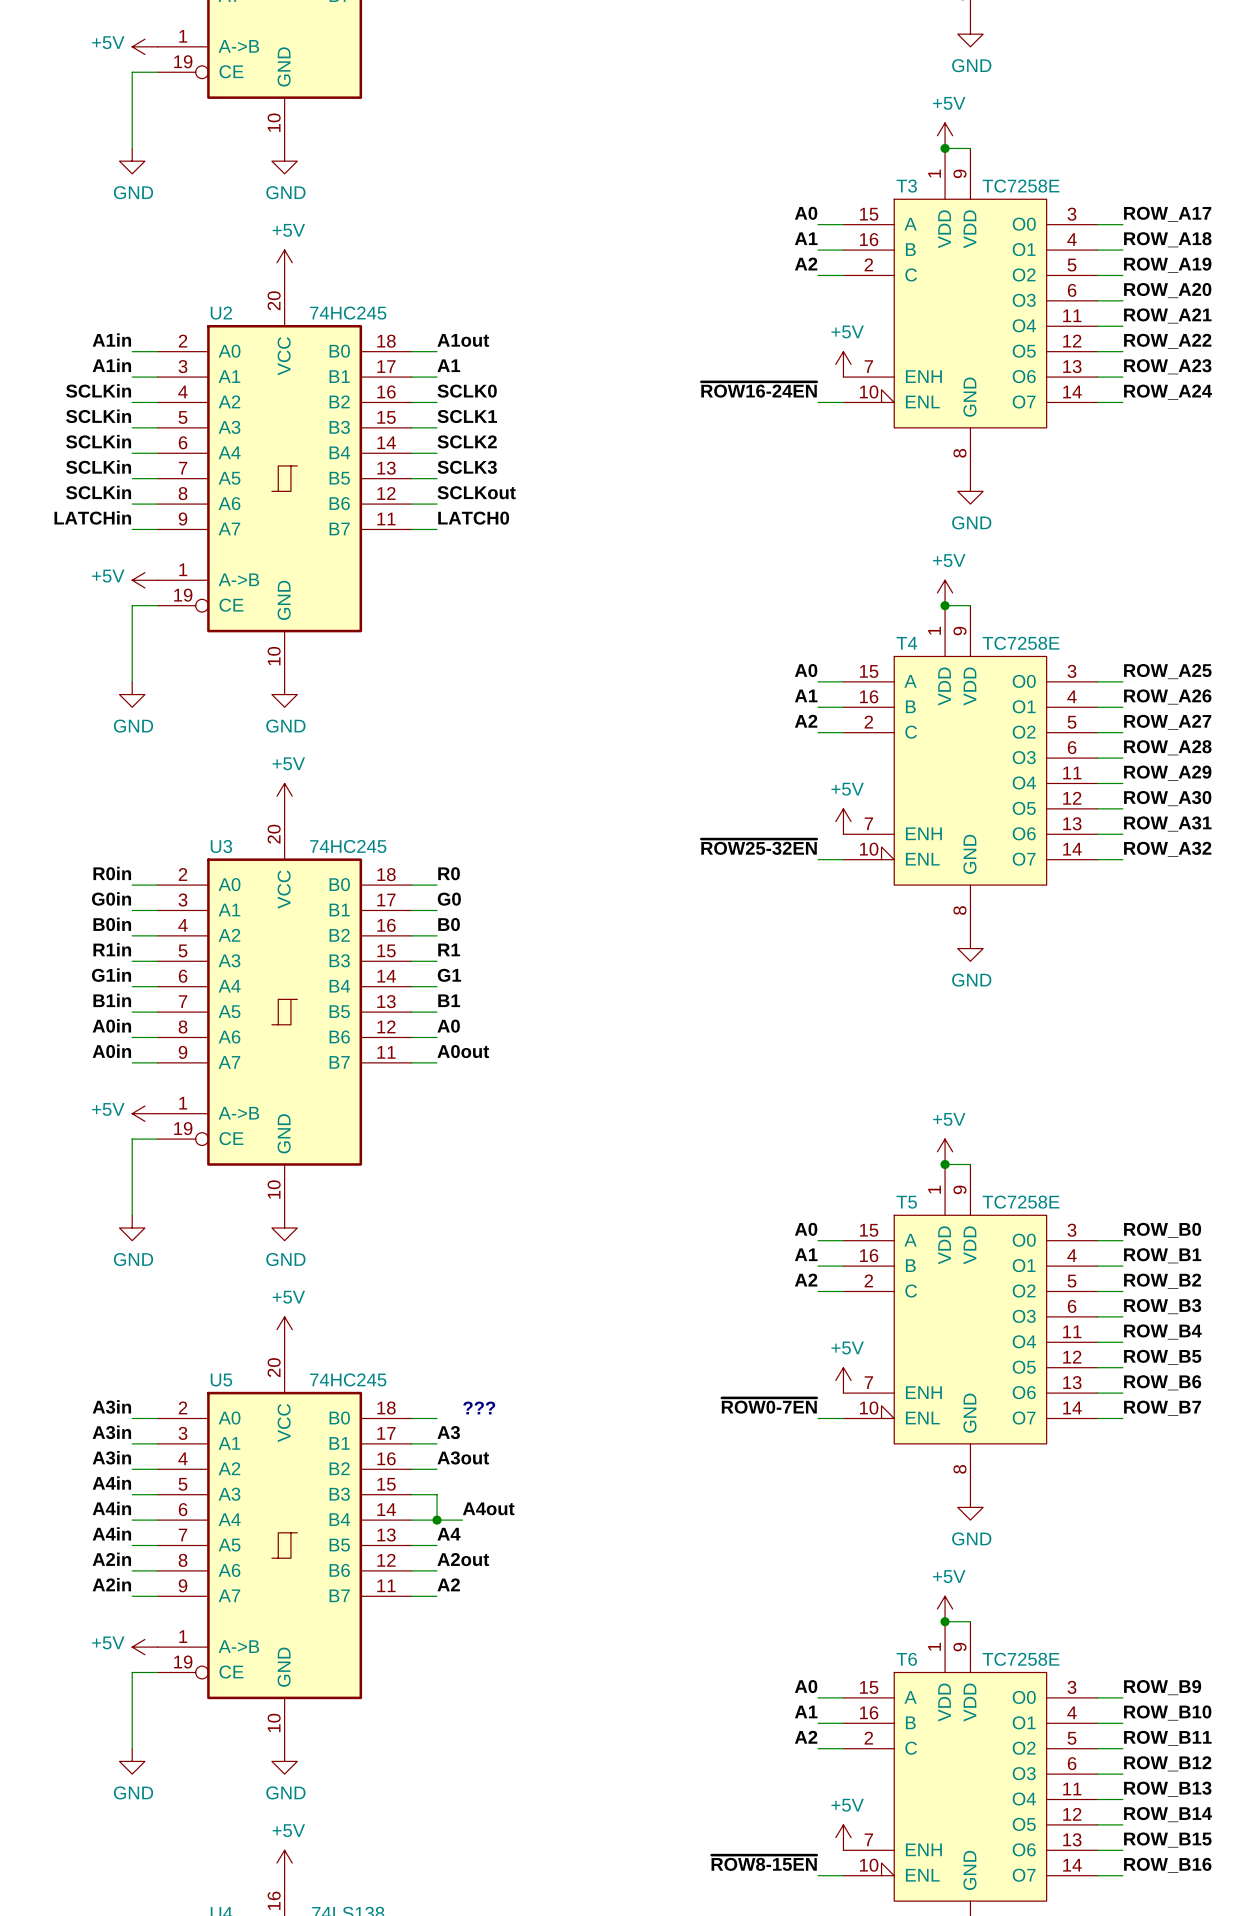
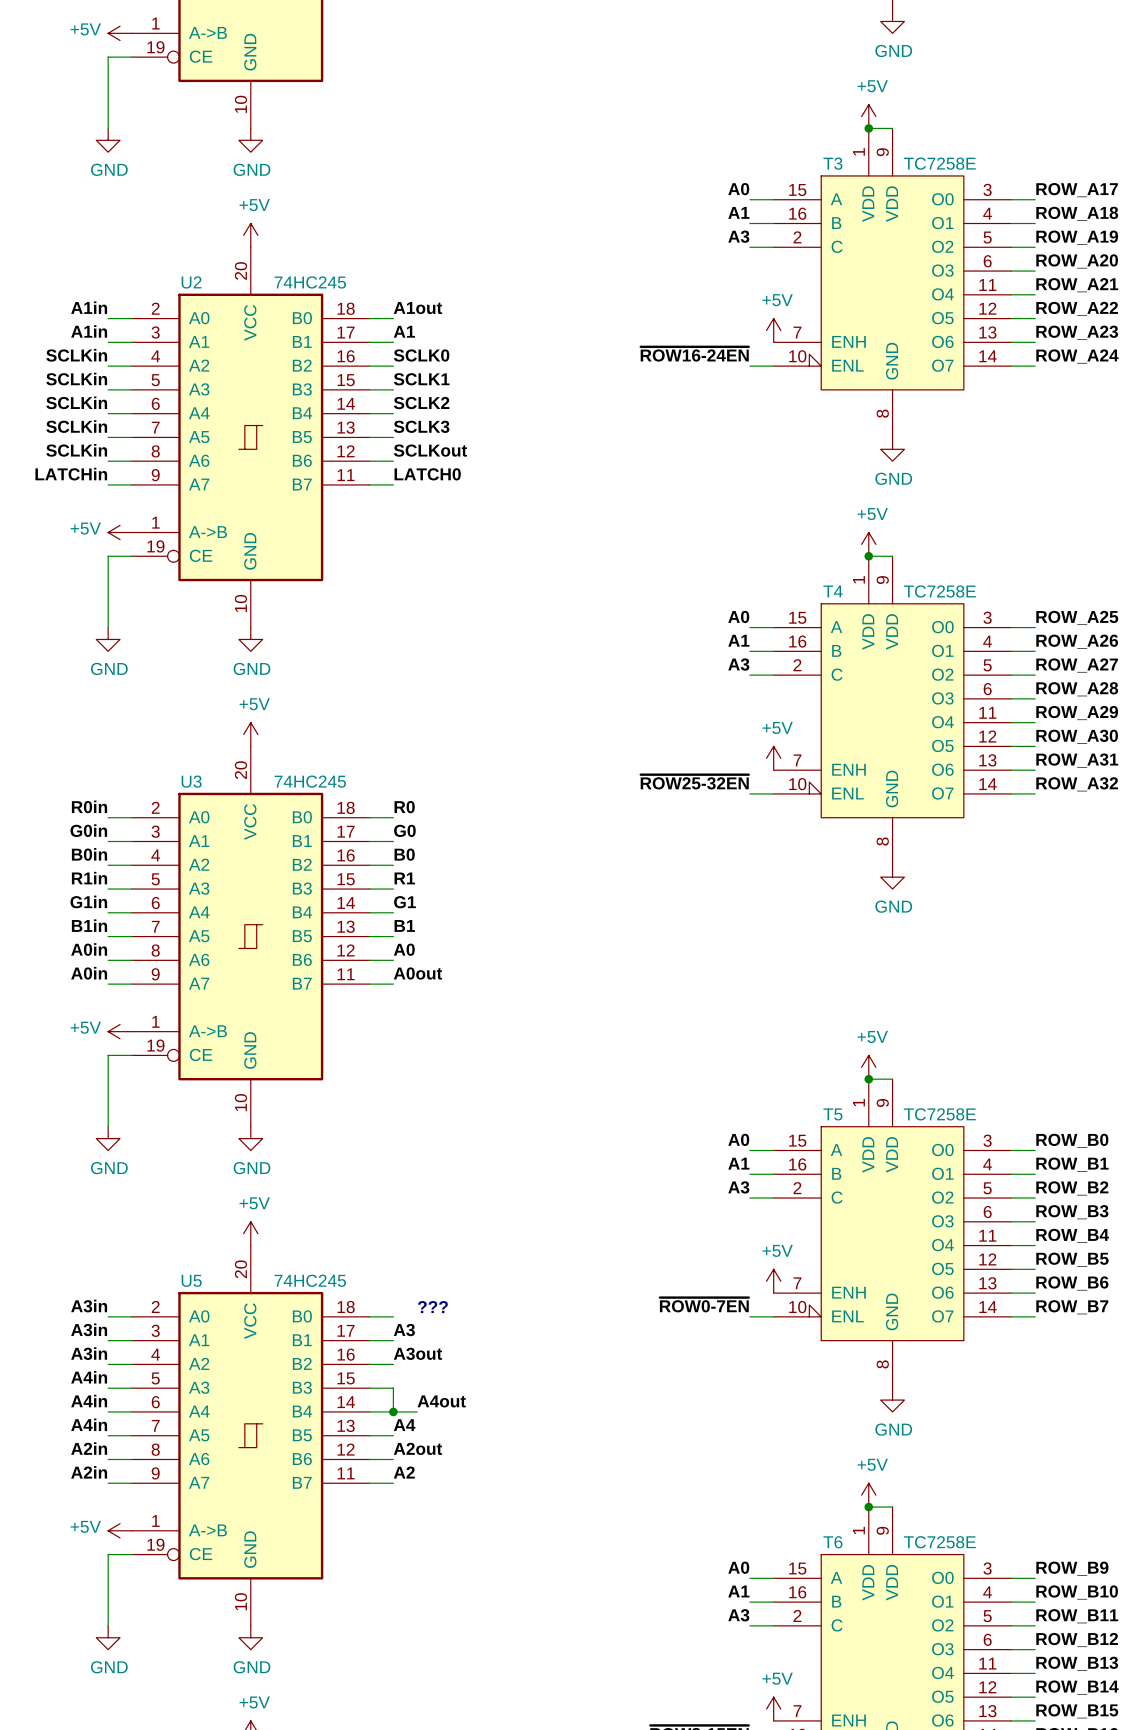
label: A2 (806, 264) -> A3 (738, 236)
label: A2 (806, 721) -> A3 (738, 664)
label: A2 (806, 1280) -> A3 (738, 1187)
label: A2 (806, 1737) -> A3 (738, 1615)

